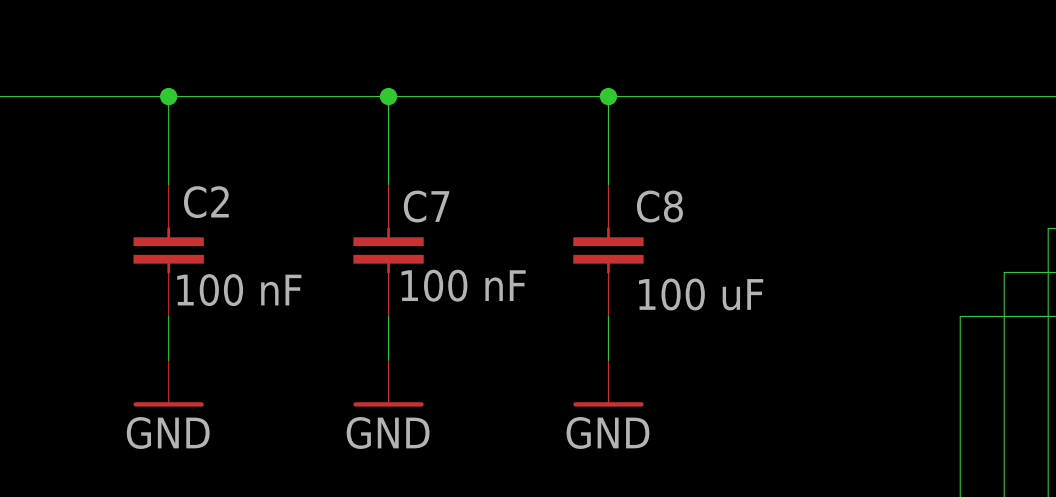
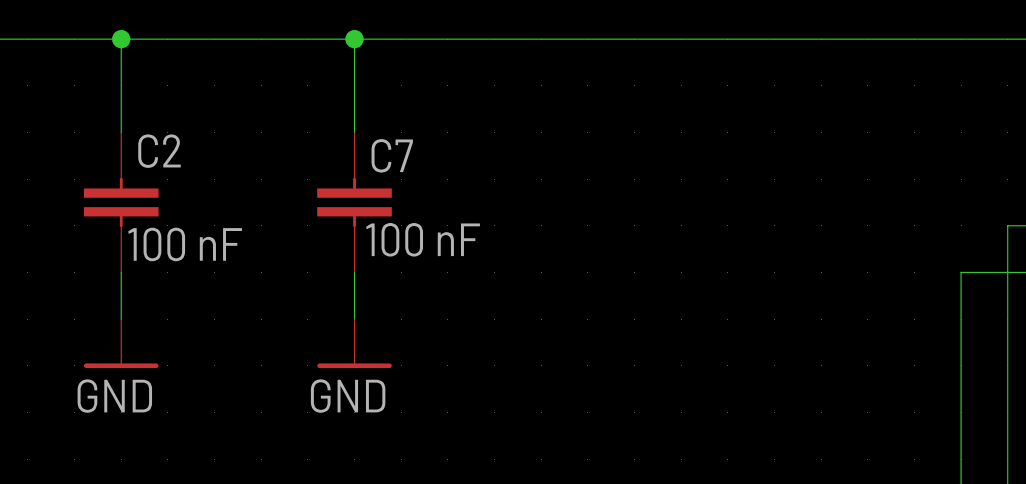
wire: (608, 96) (608, 184) -> none
junction: (608, 96) -> none
C8: 100 uF (608, 250) -> none
wire: (608, 316) (608, 360) -> none
power symbol: GND (608, 383) -> none

